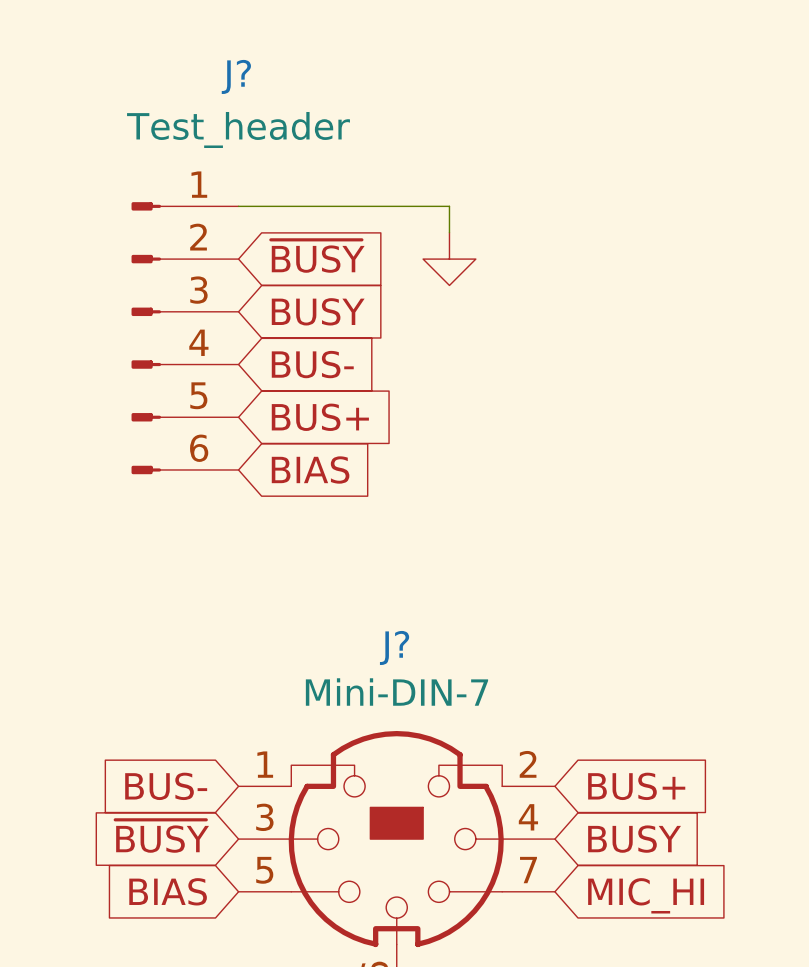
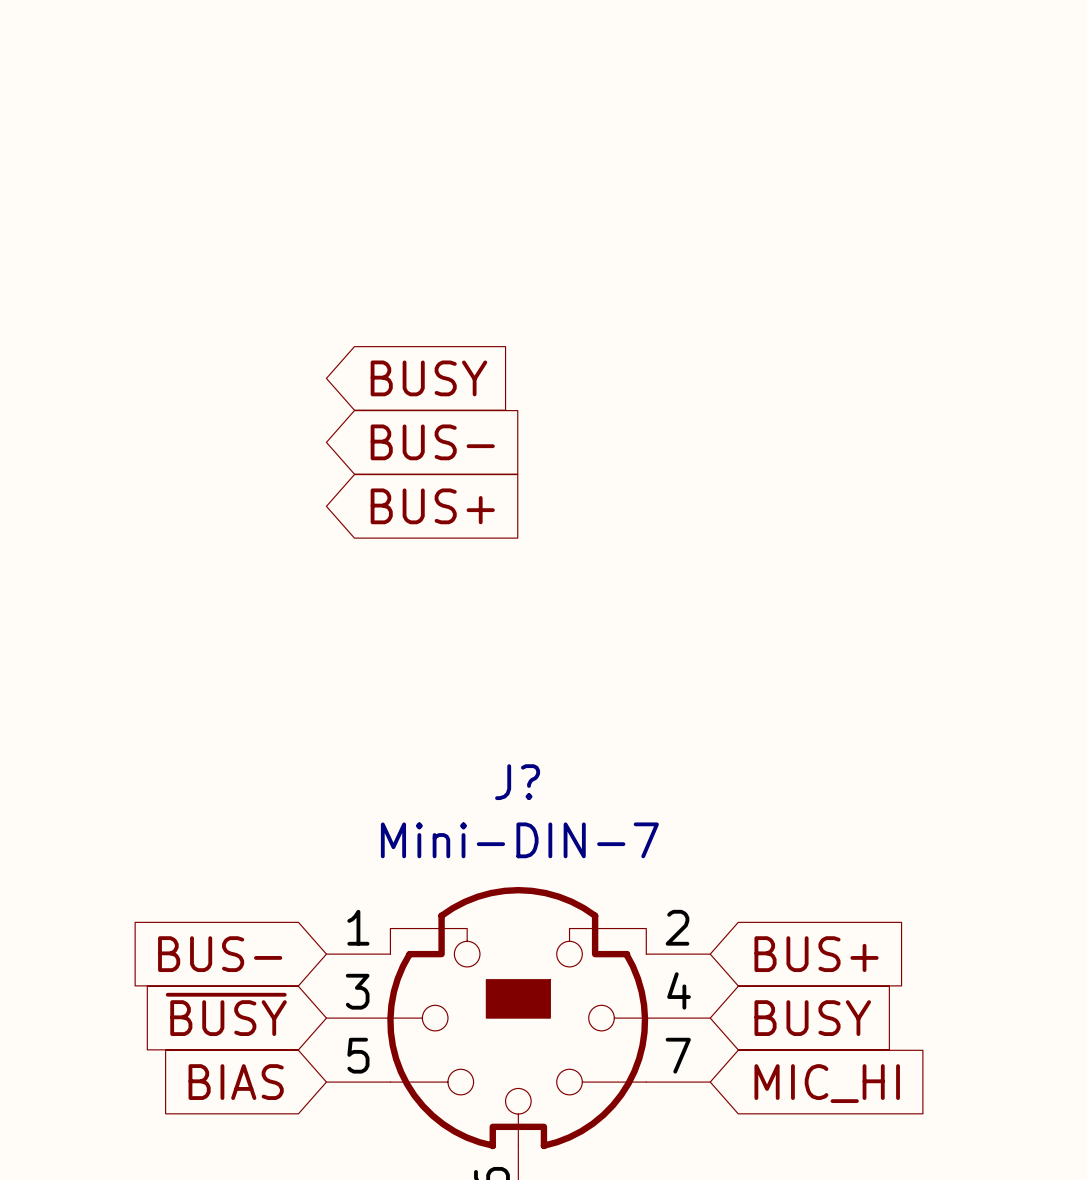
wire: (238, 206) (449, 206) (449, 232) -> none
global label: ~{BUSY} (317, 256) -> none
power symbol: (449, 259) -> none
J?: Test_header (185, 338) -> none
global label: BIAS (310, 470) -> none

